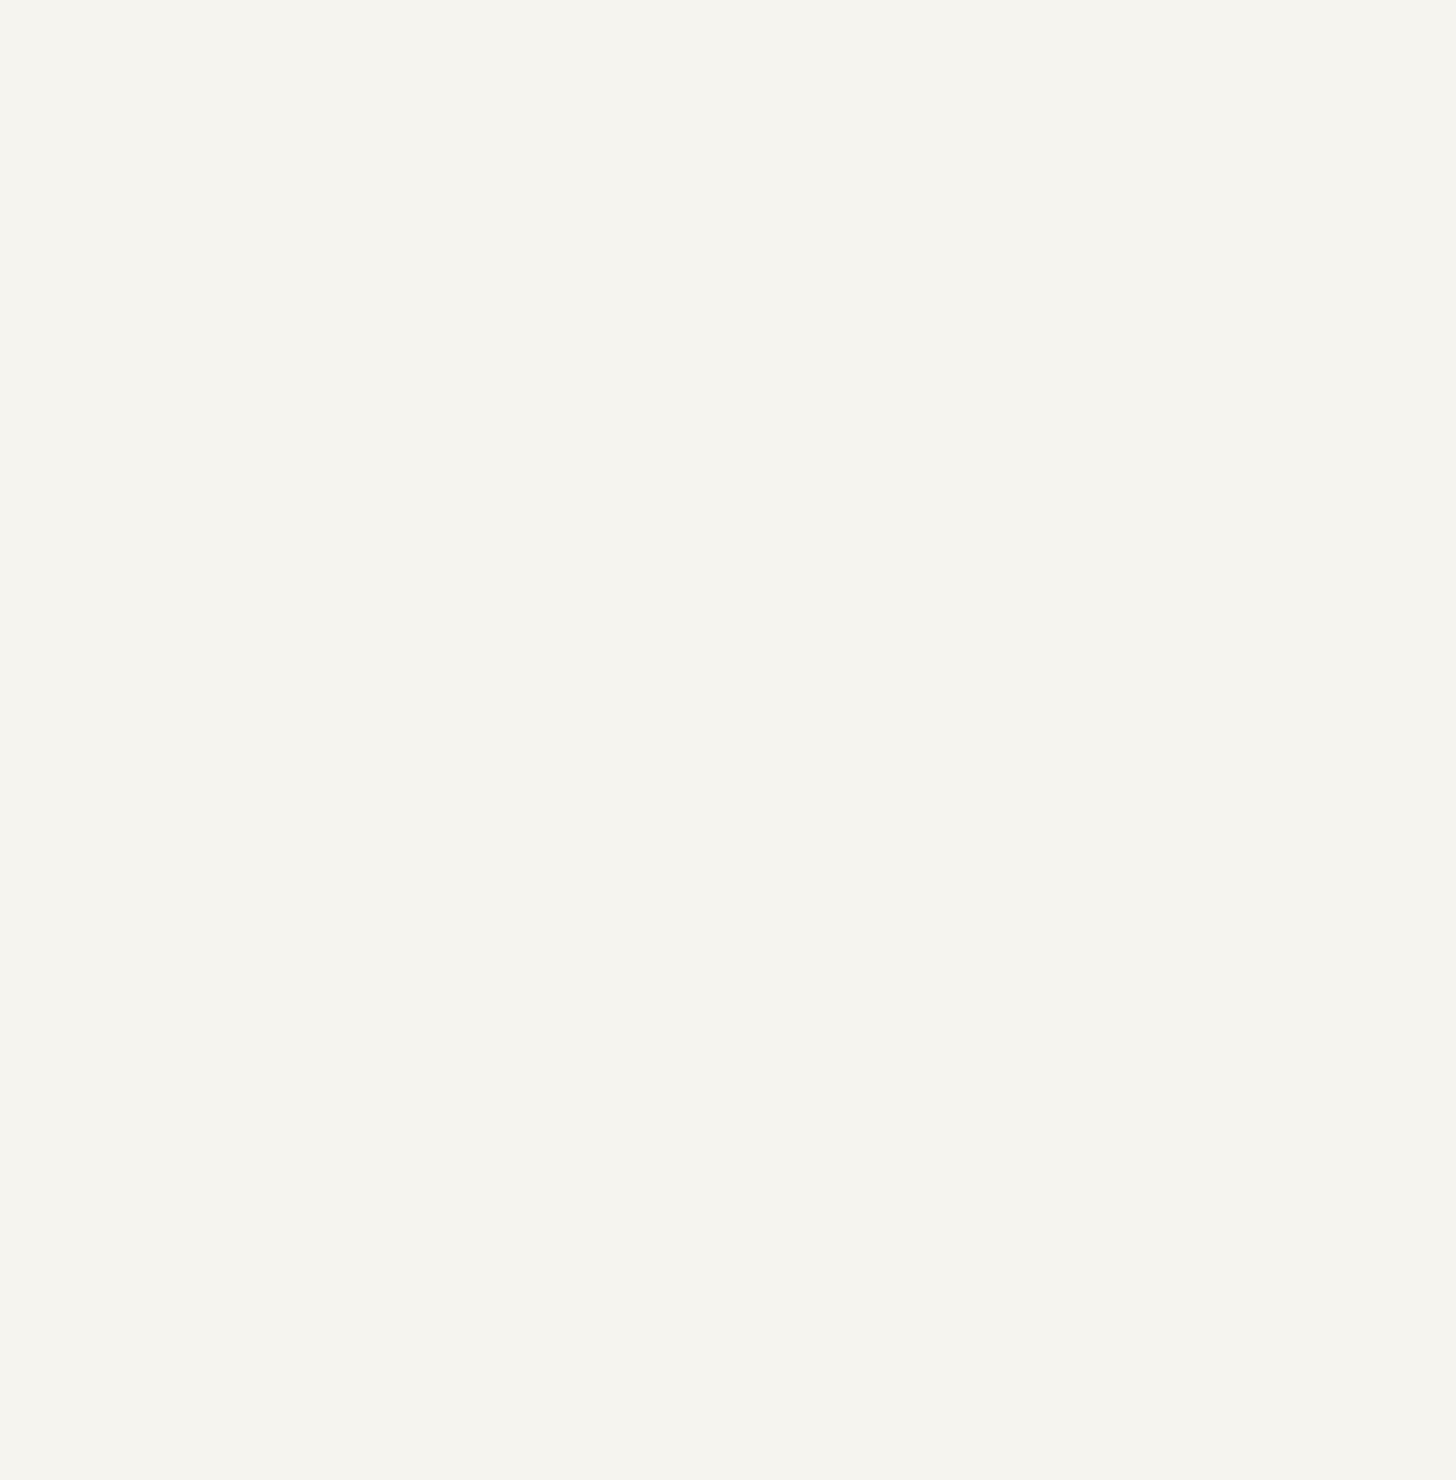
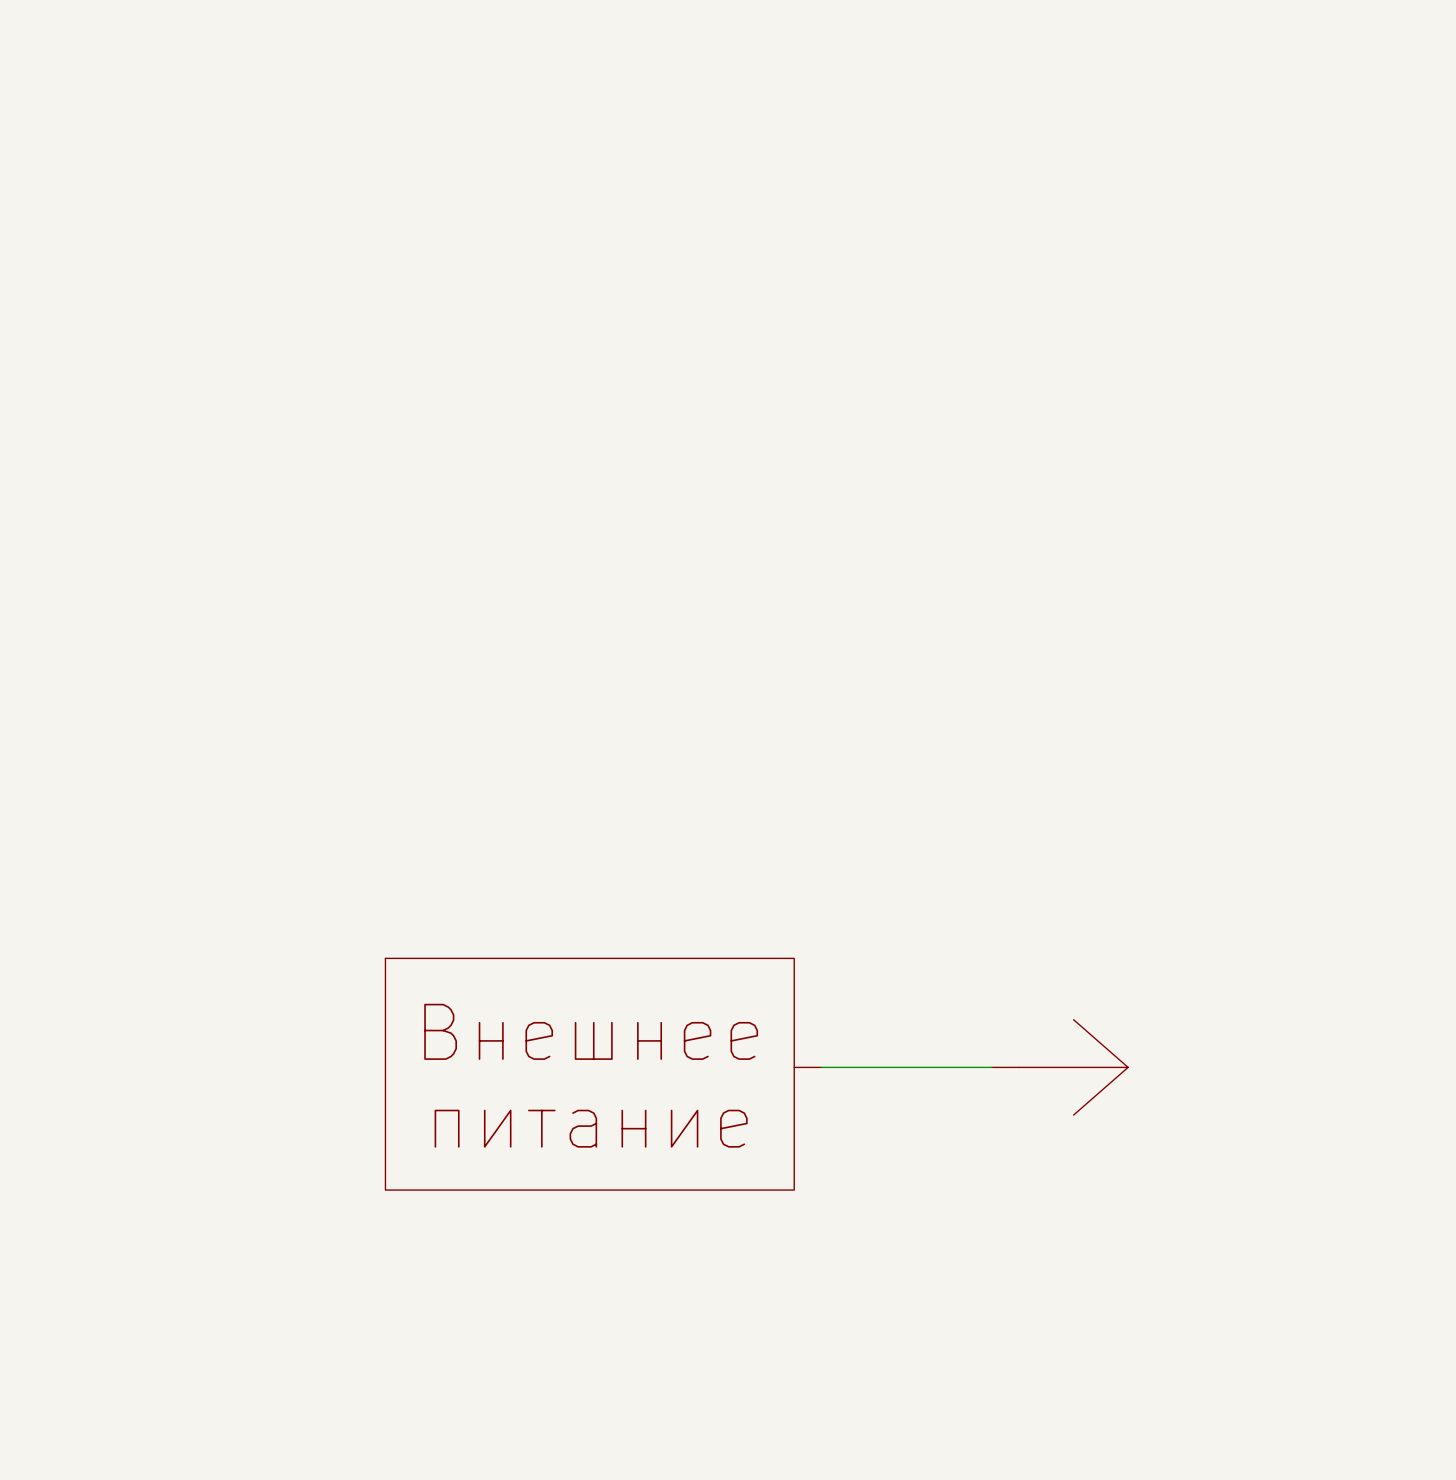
wire: none -> (821, 1067) (991, 1067)
part: none -> (1059, 1067)
part: none -> (603, 1074)

